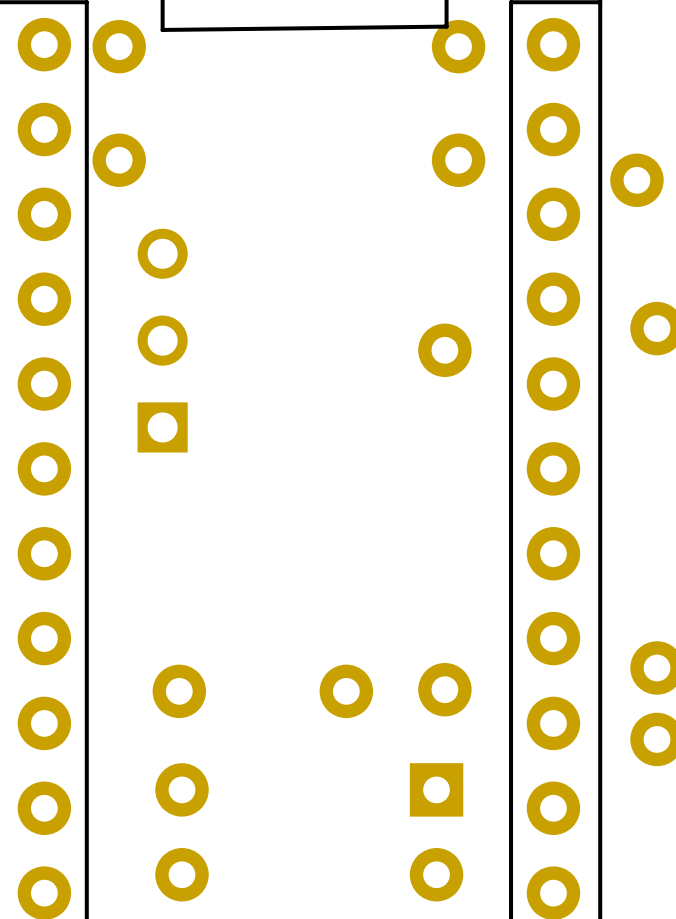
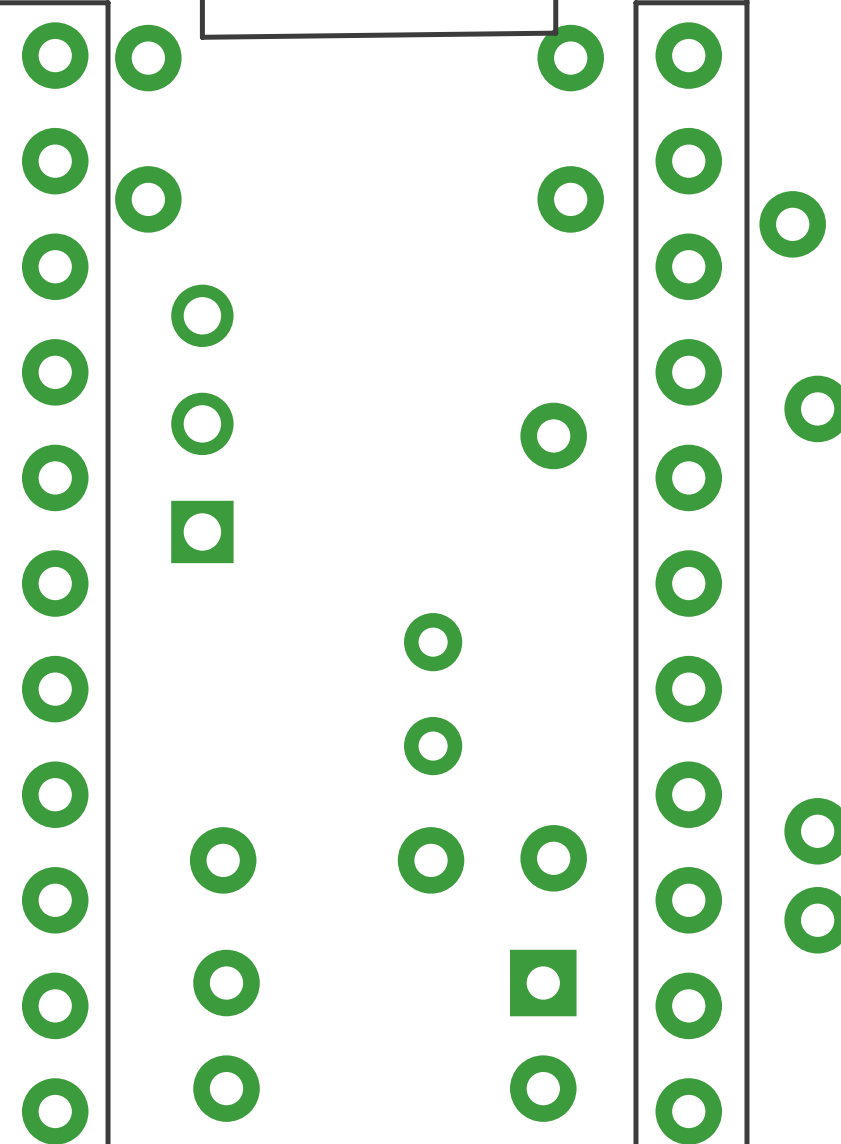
part: none -> (433, 694)

